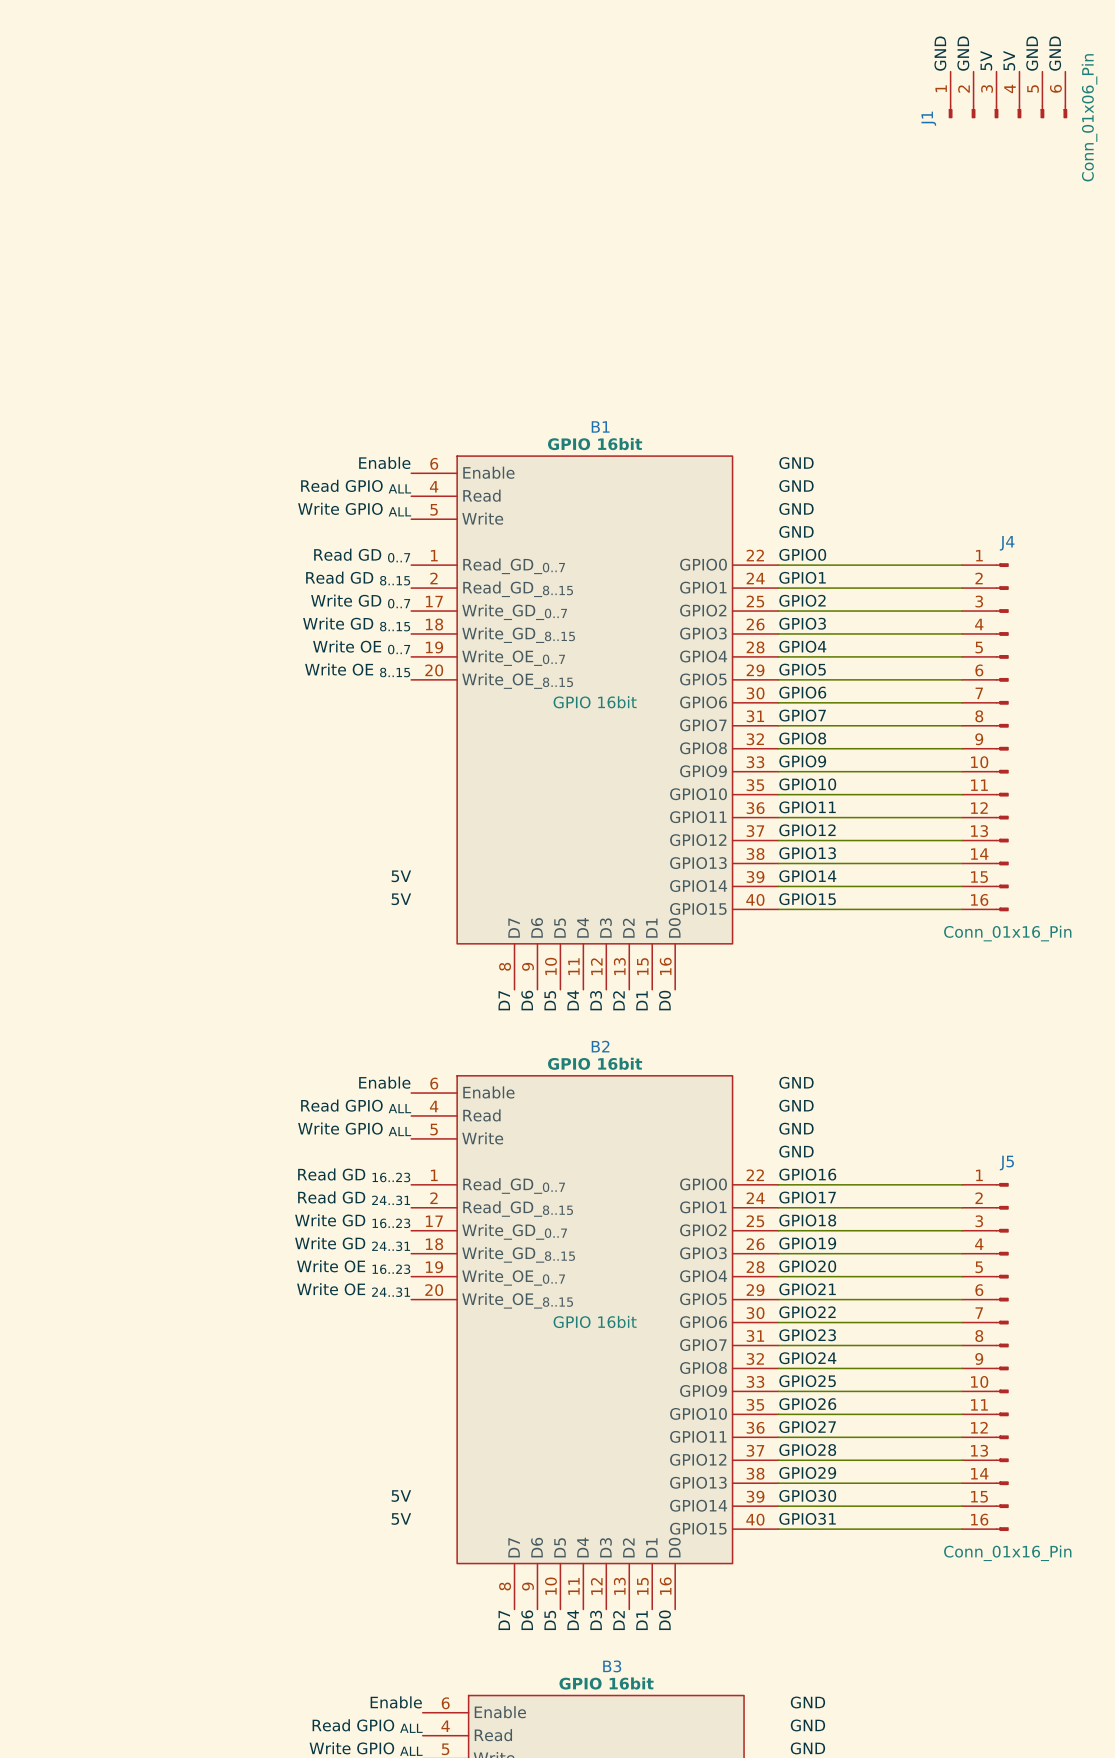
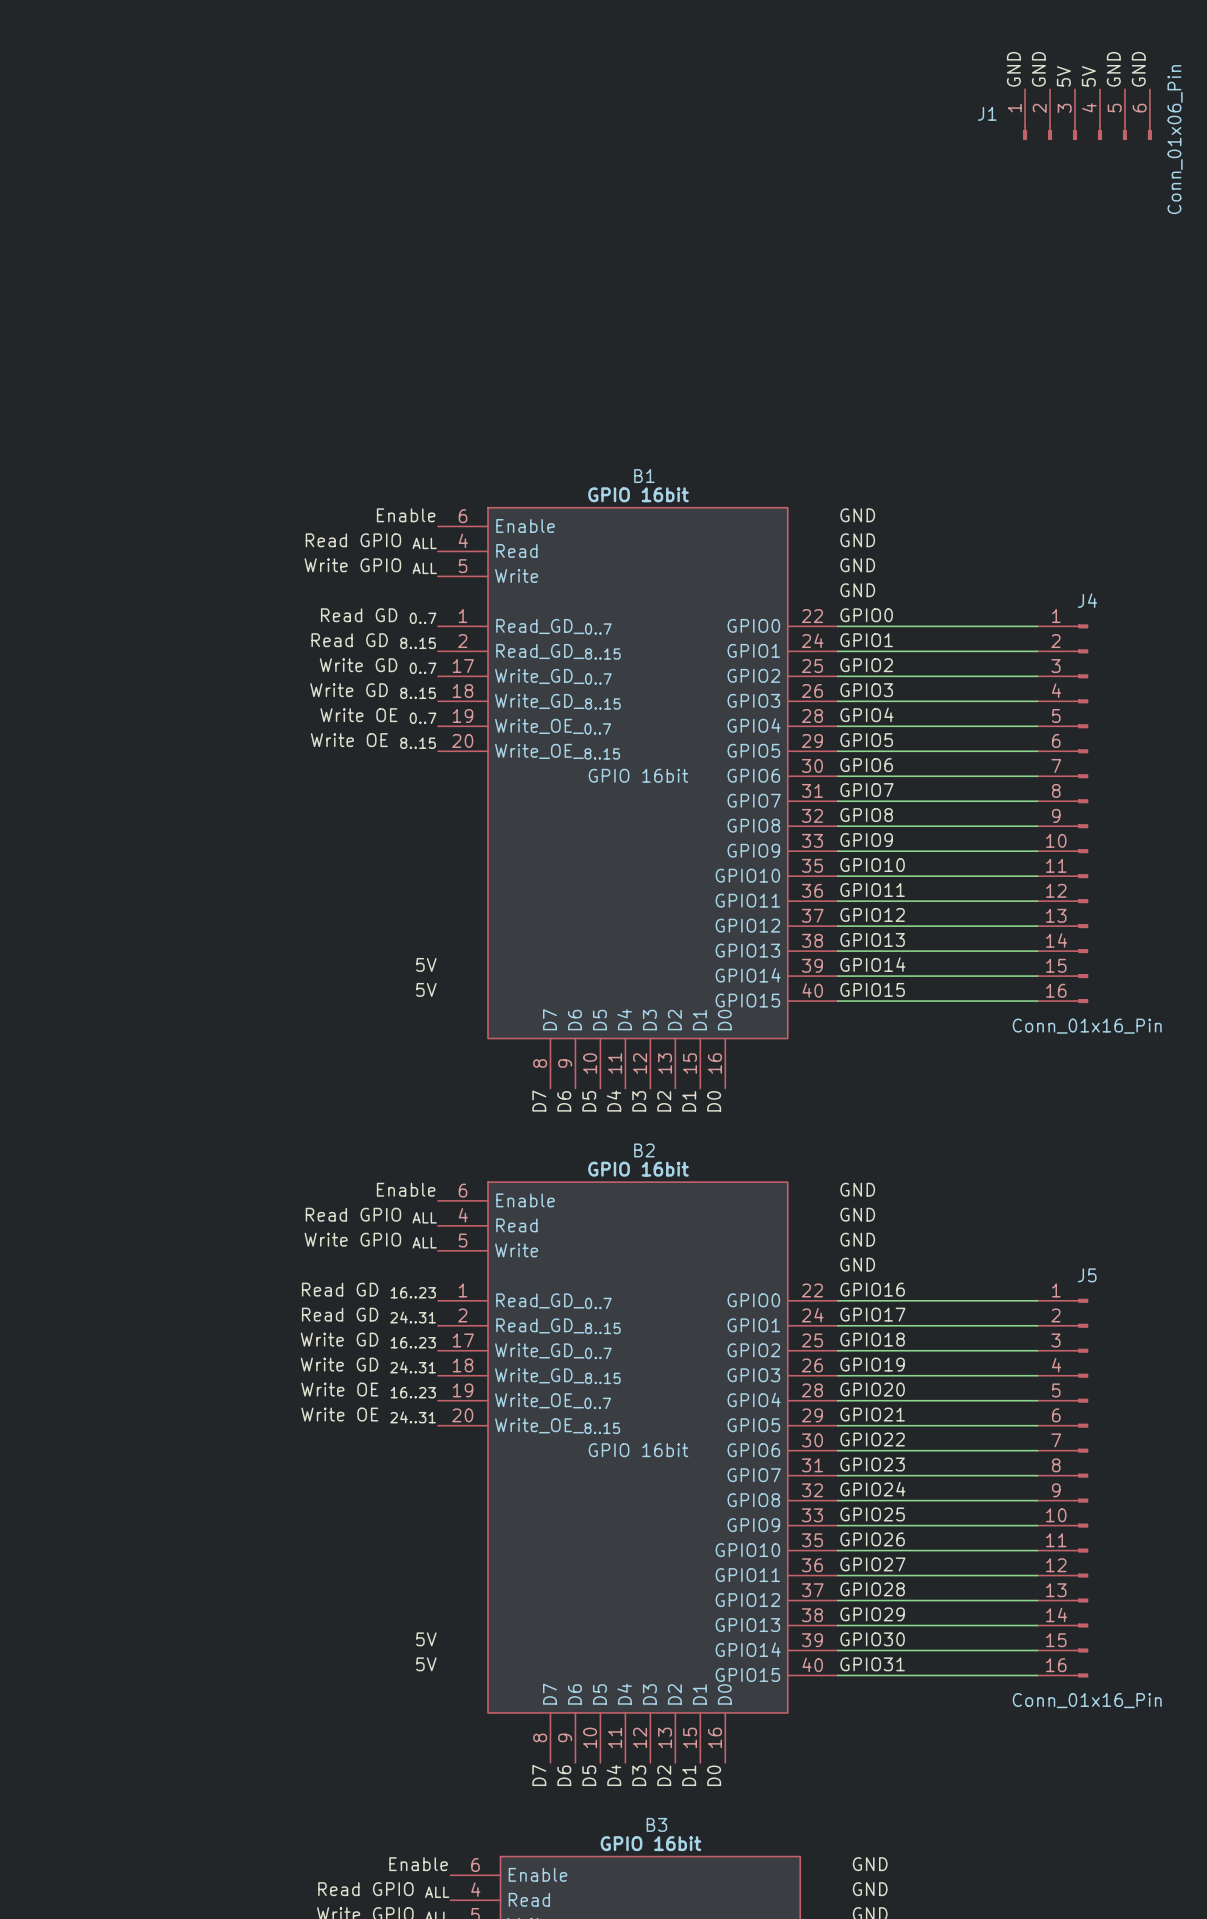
J1 name rotation: 0° (928, 118) -> 90° clockwise (987, 113)

